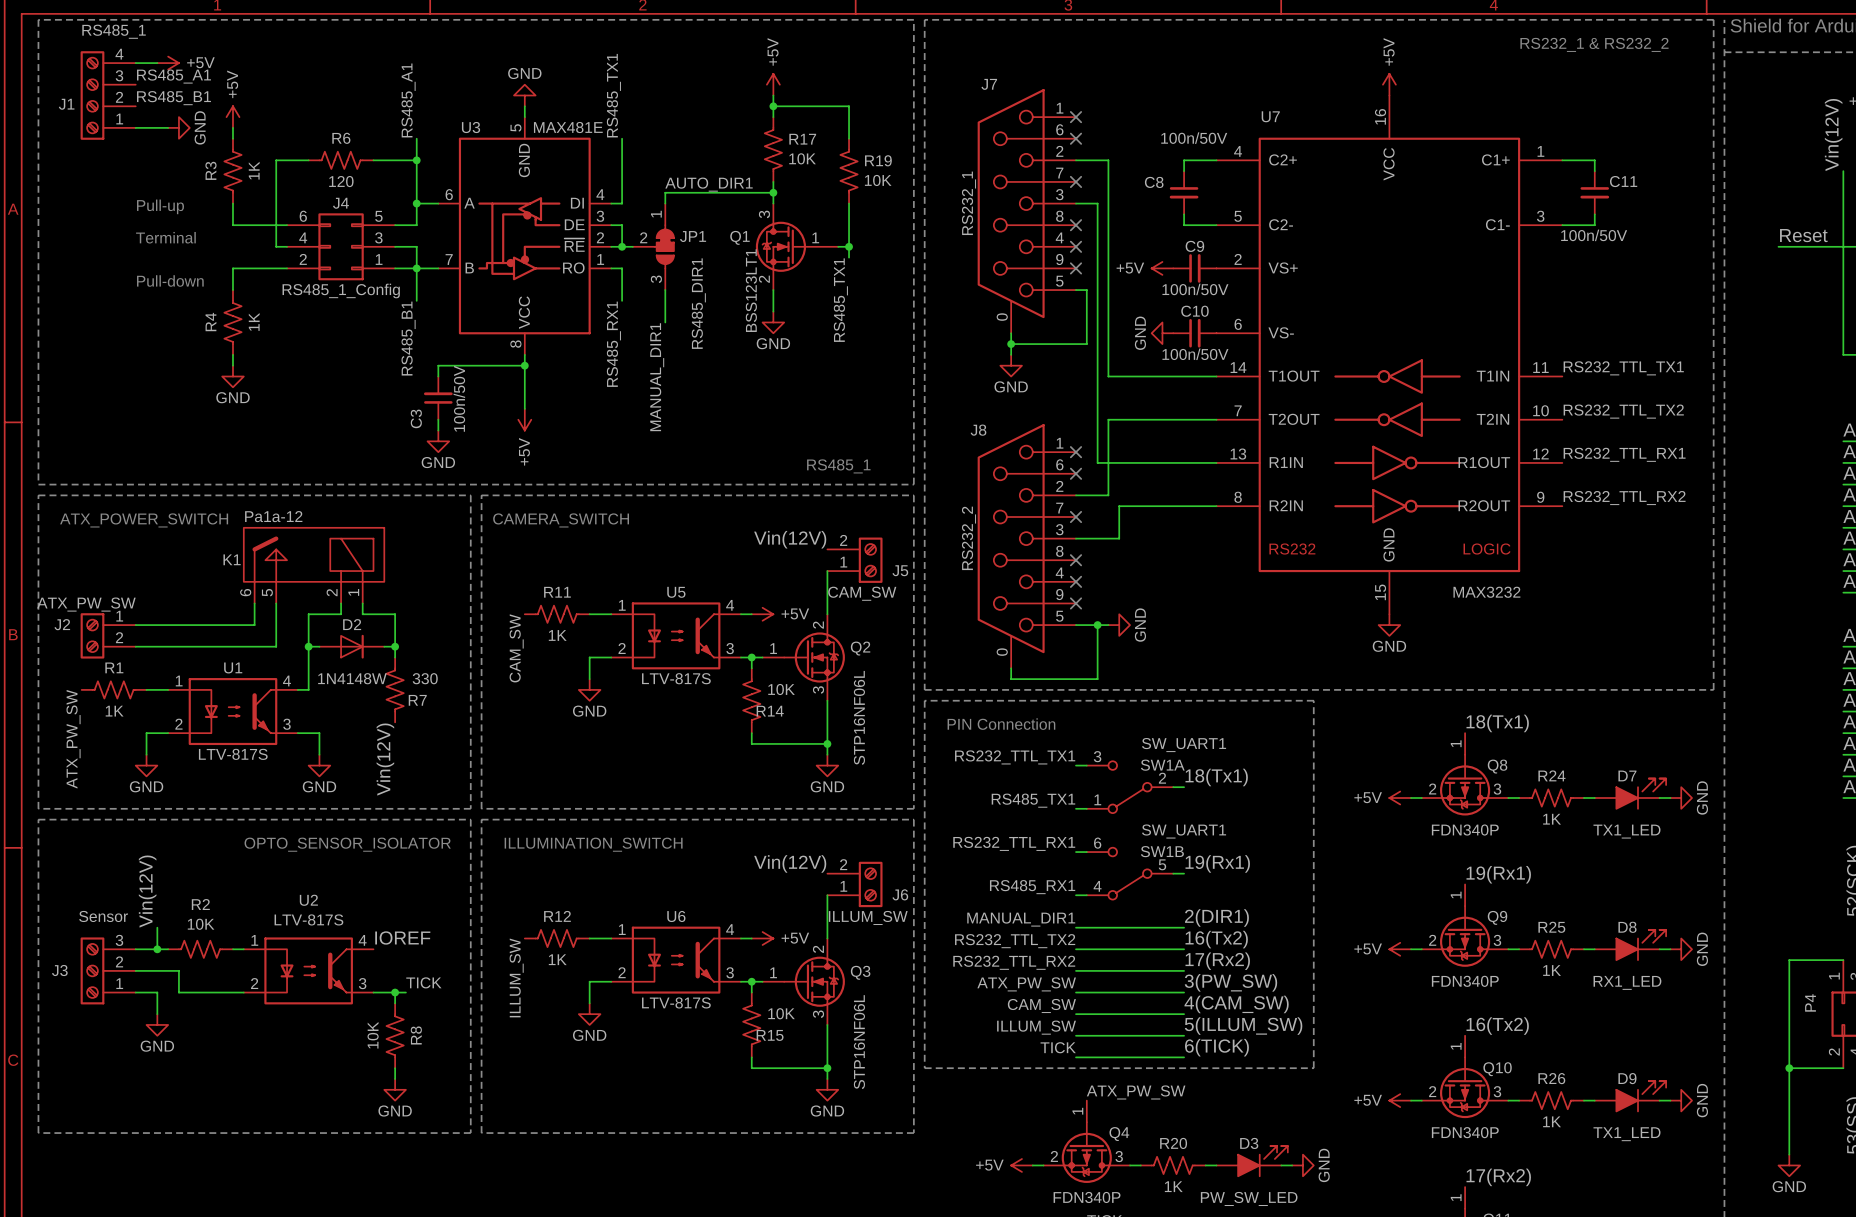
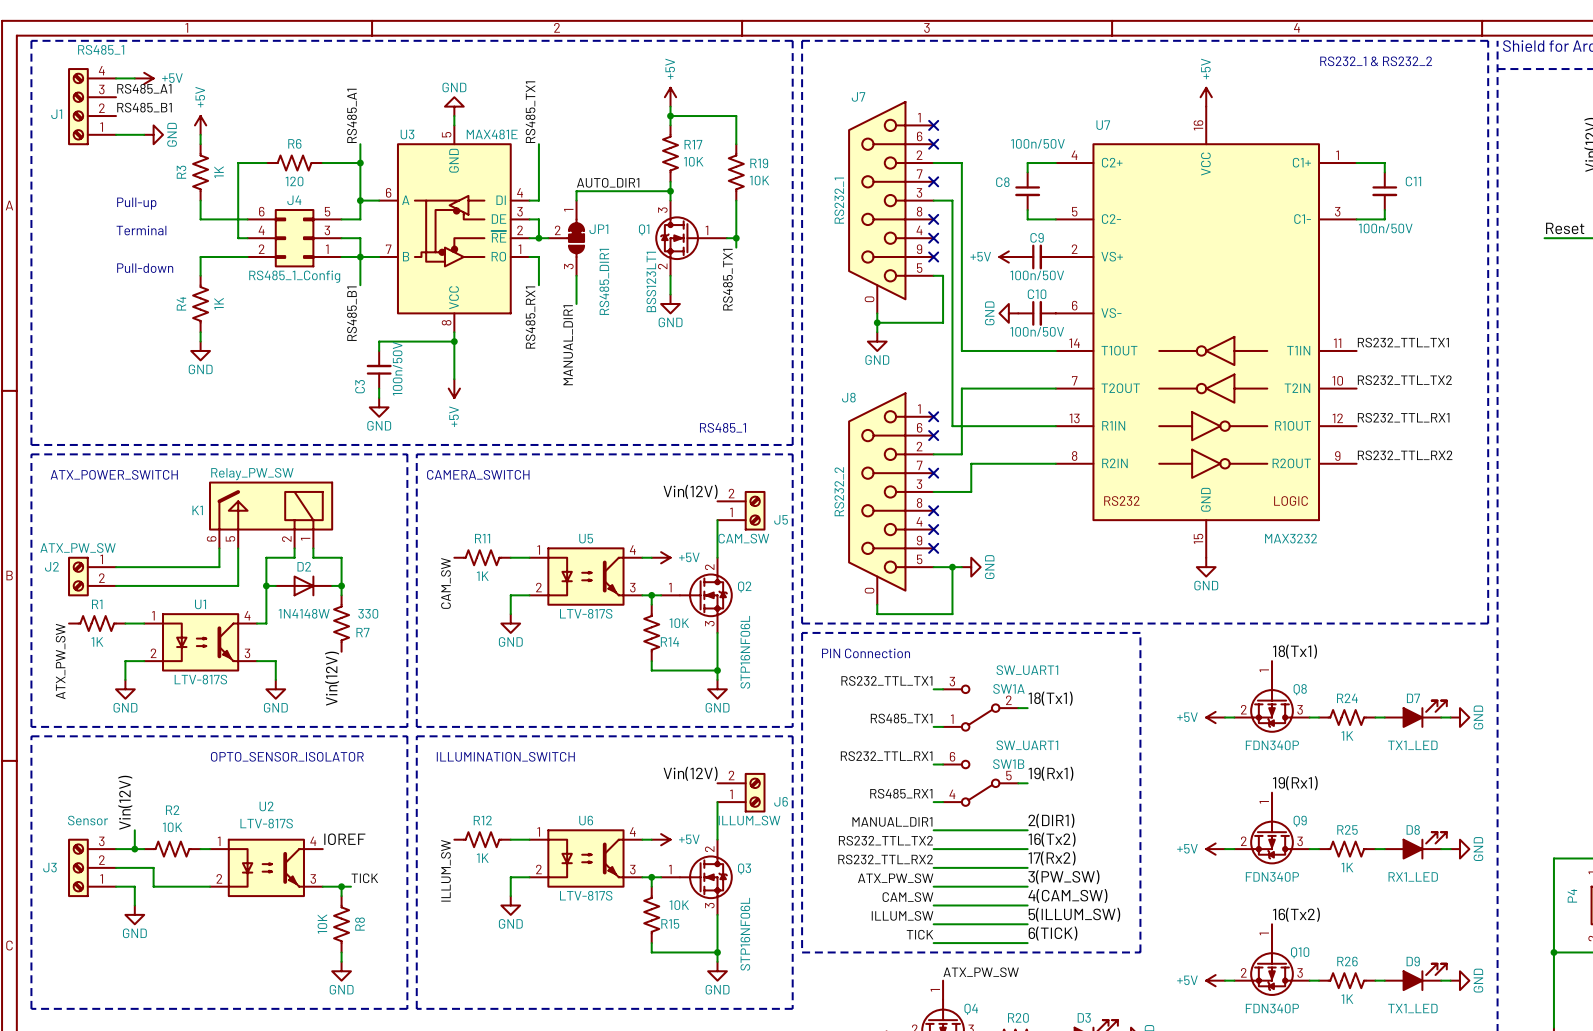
K1 value: Pa1a-12 (273, 516) -> Relay_PW_SW (252, 474)

